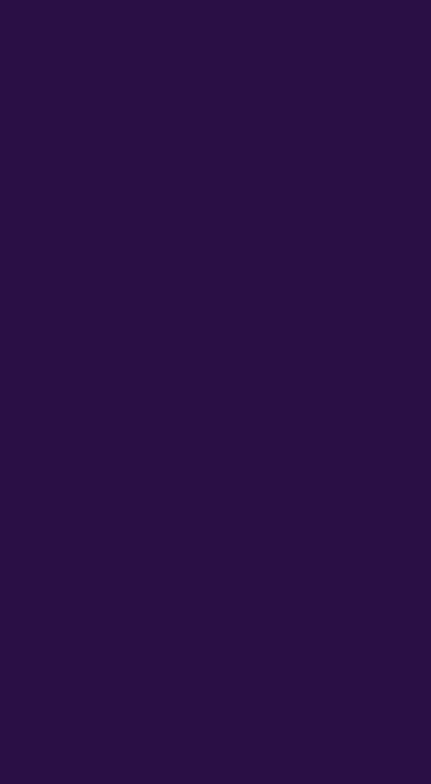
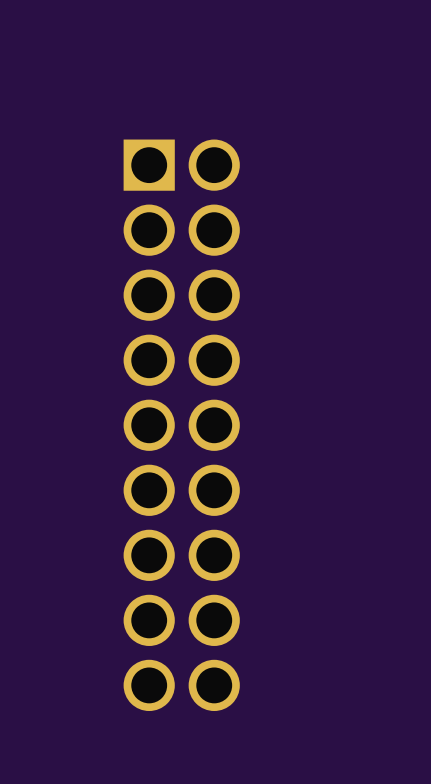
part: none -> (181, 425)

